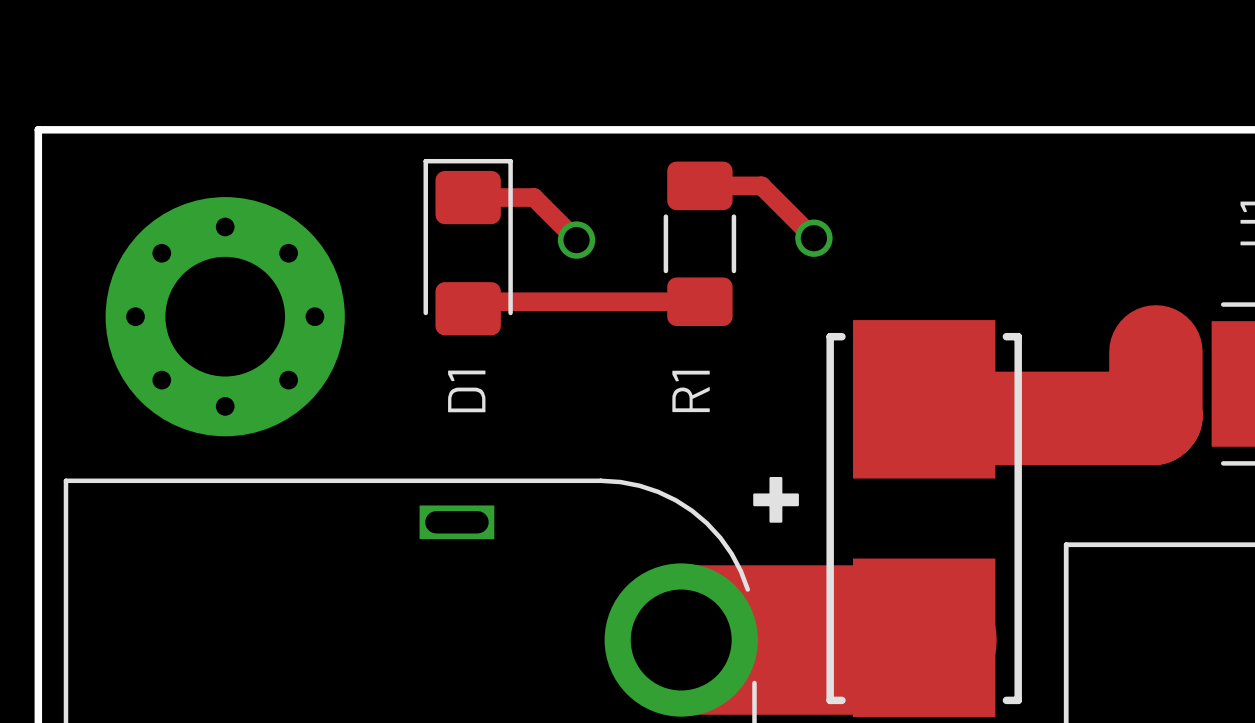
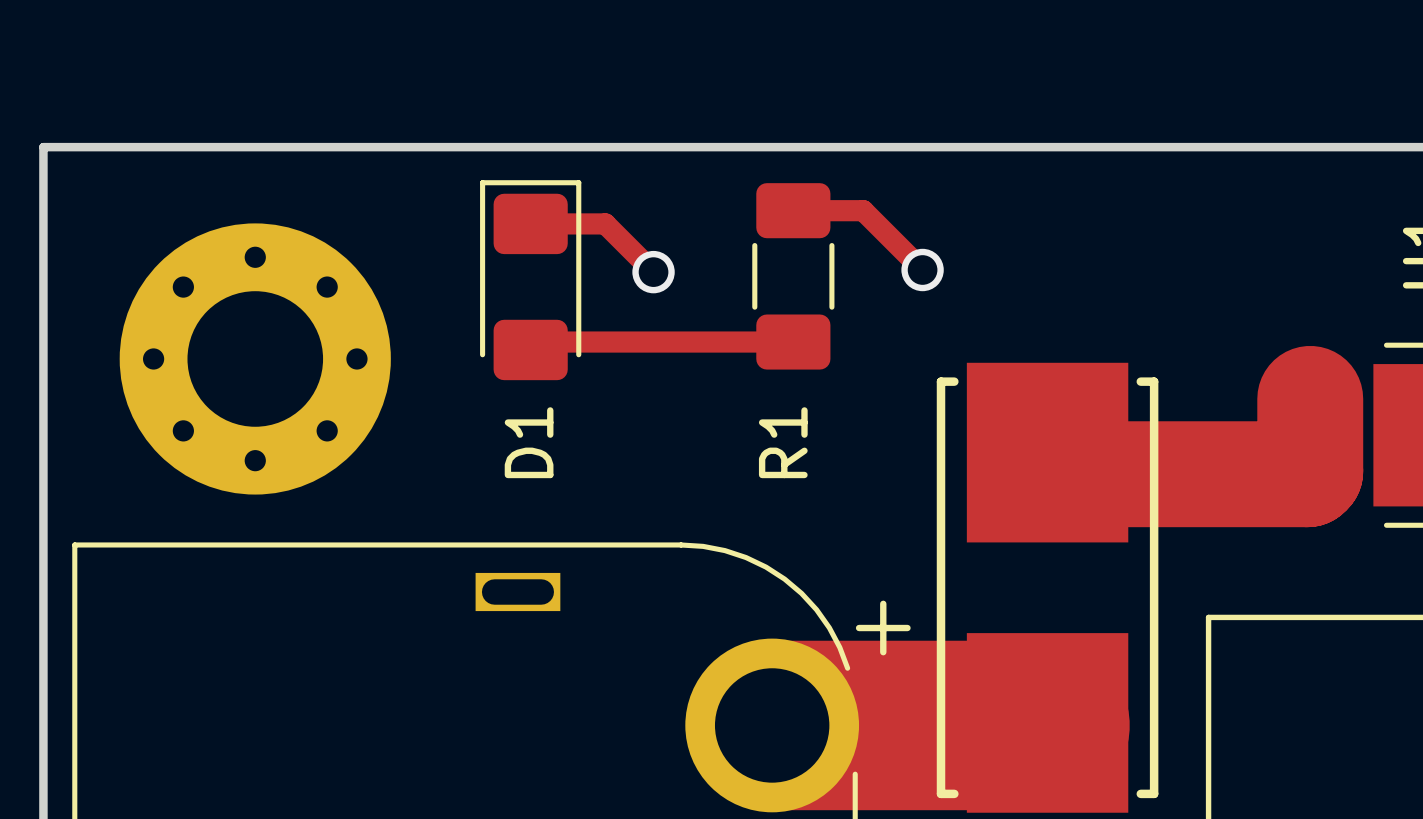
text: + (776, 499) -> none
part text: none -> + (883, 628)

